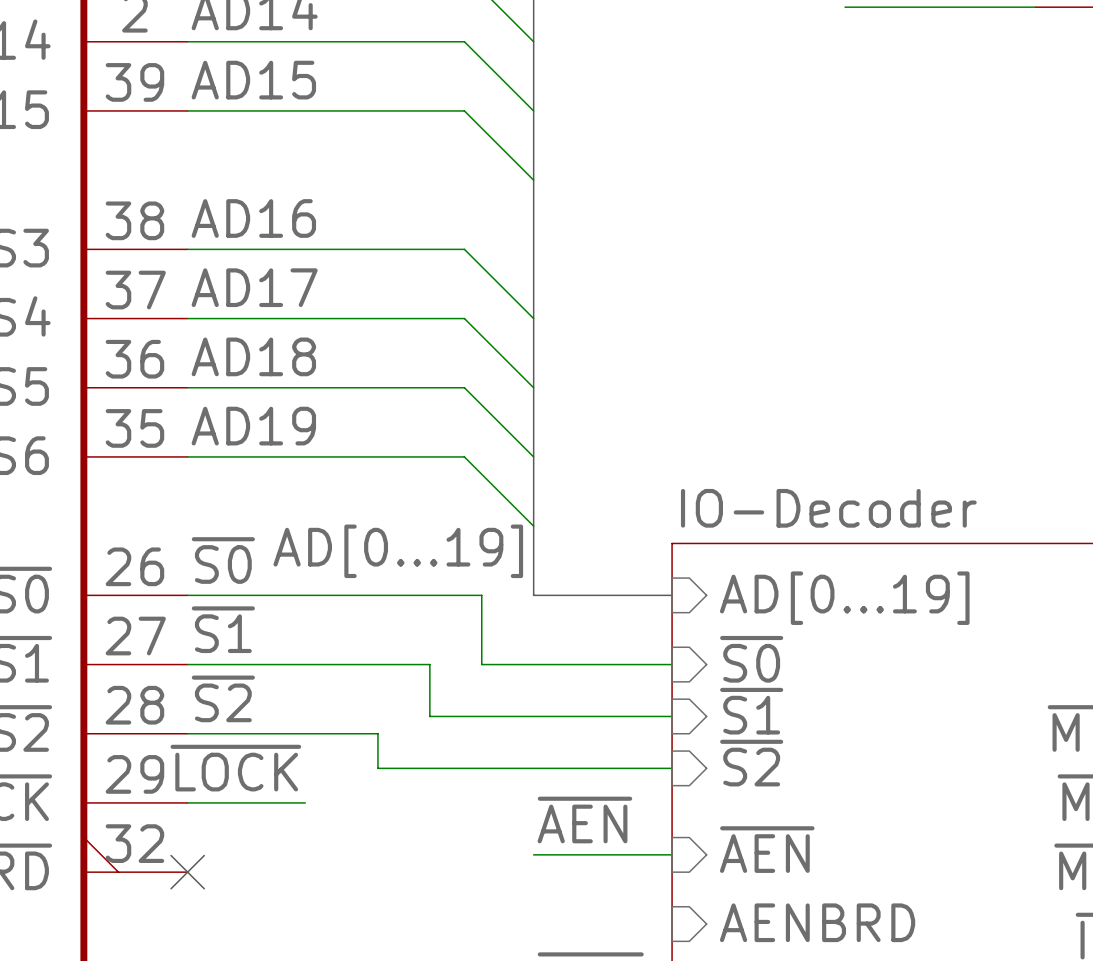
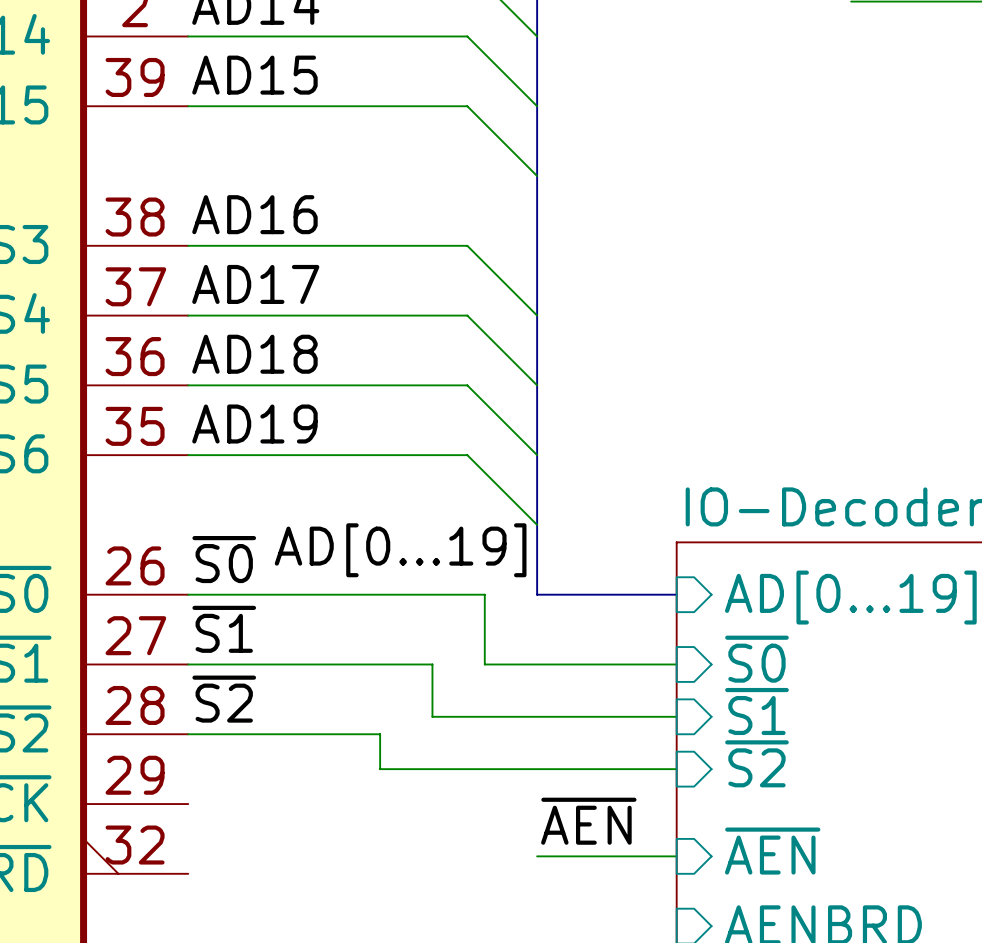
label: ~{LOCK} (235, 768) -> none
wire: (187, 802) (305, 802) -> none
no-connect mark: (187, 872) -> none

